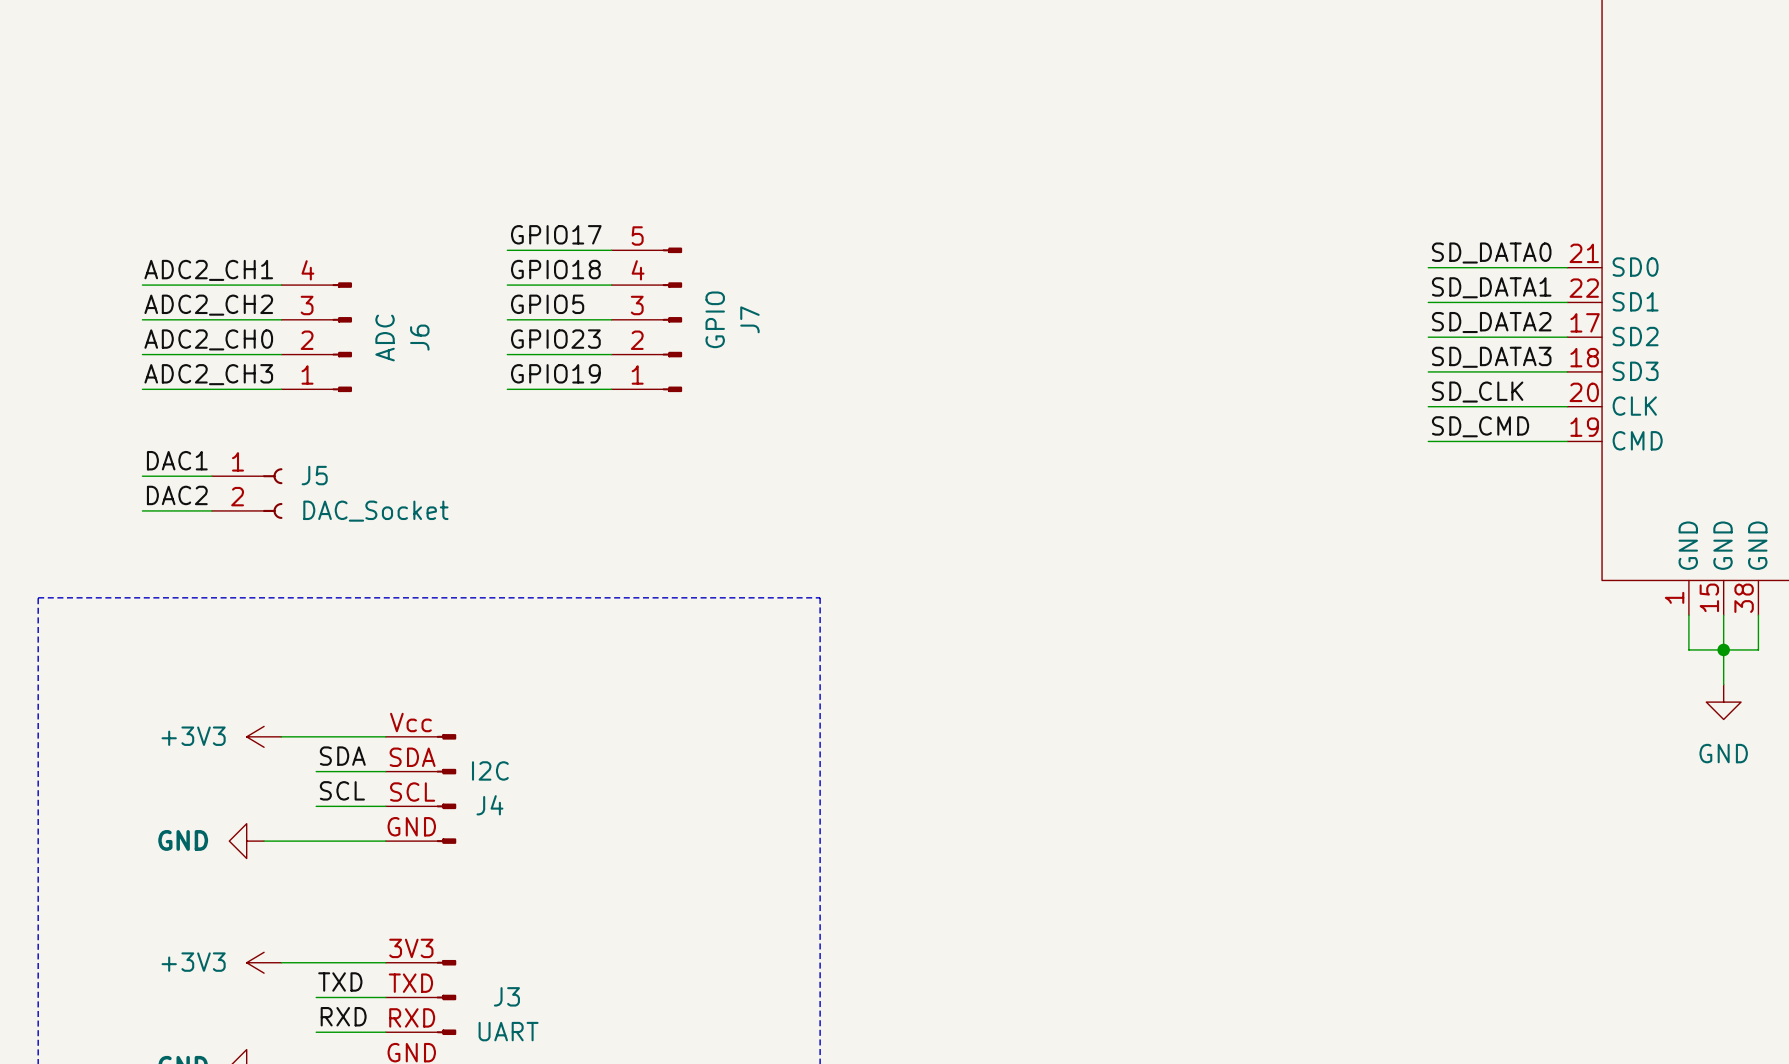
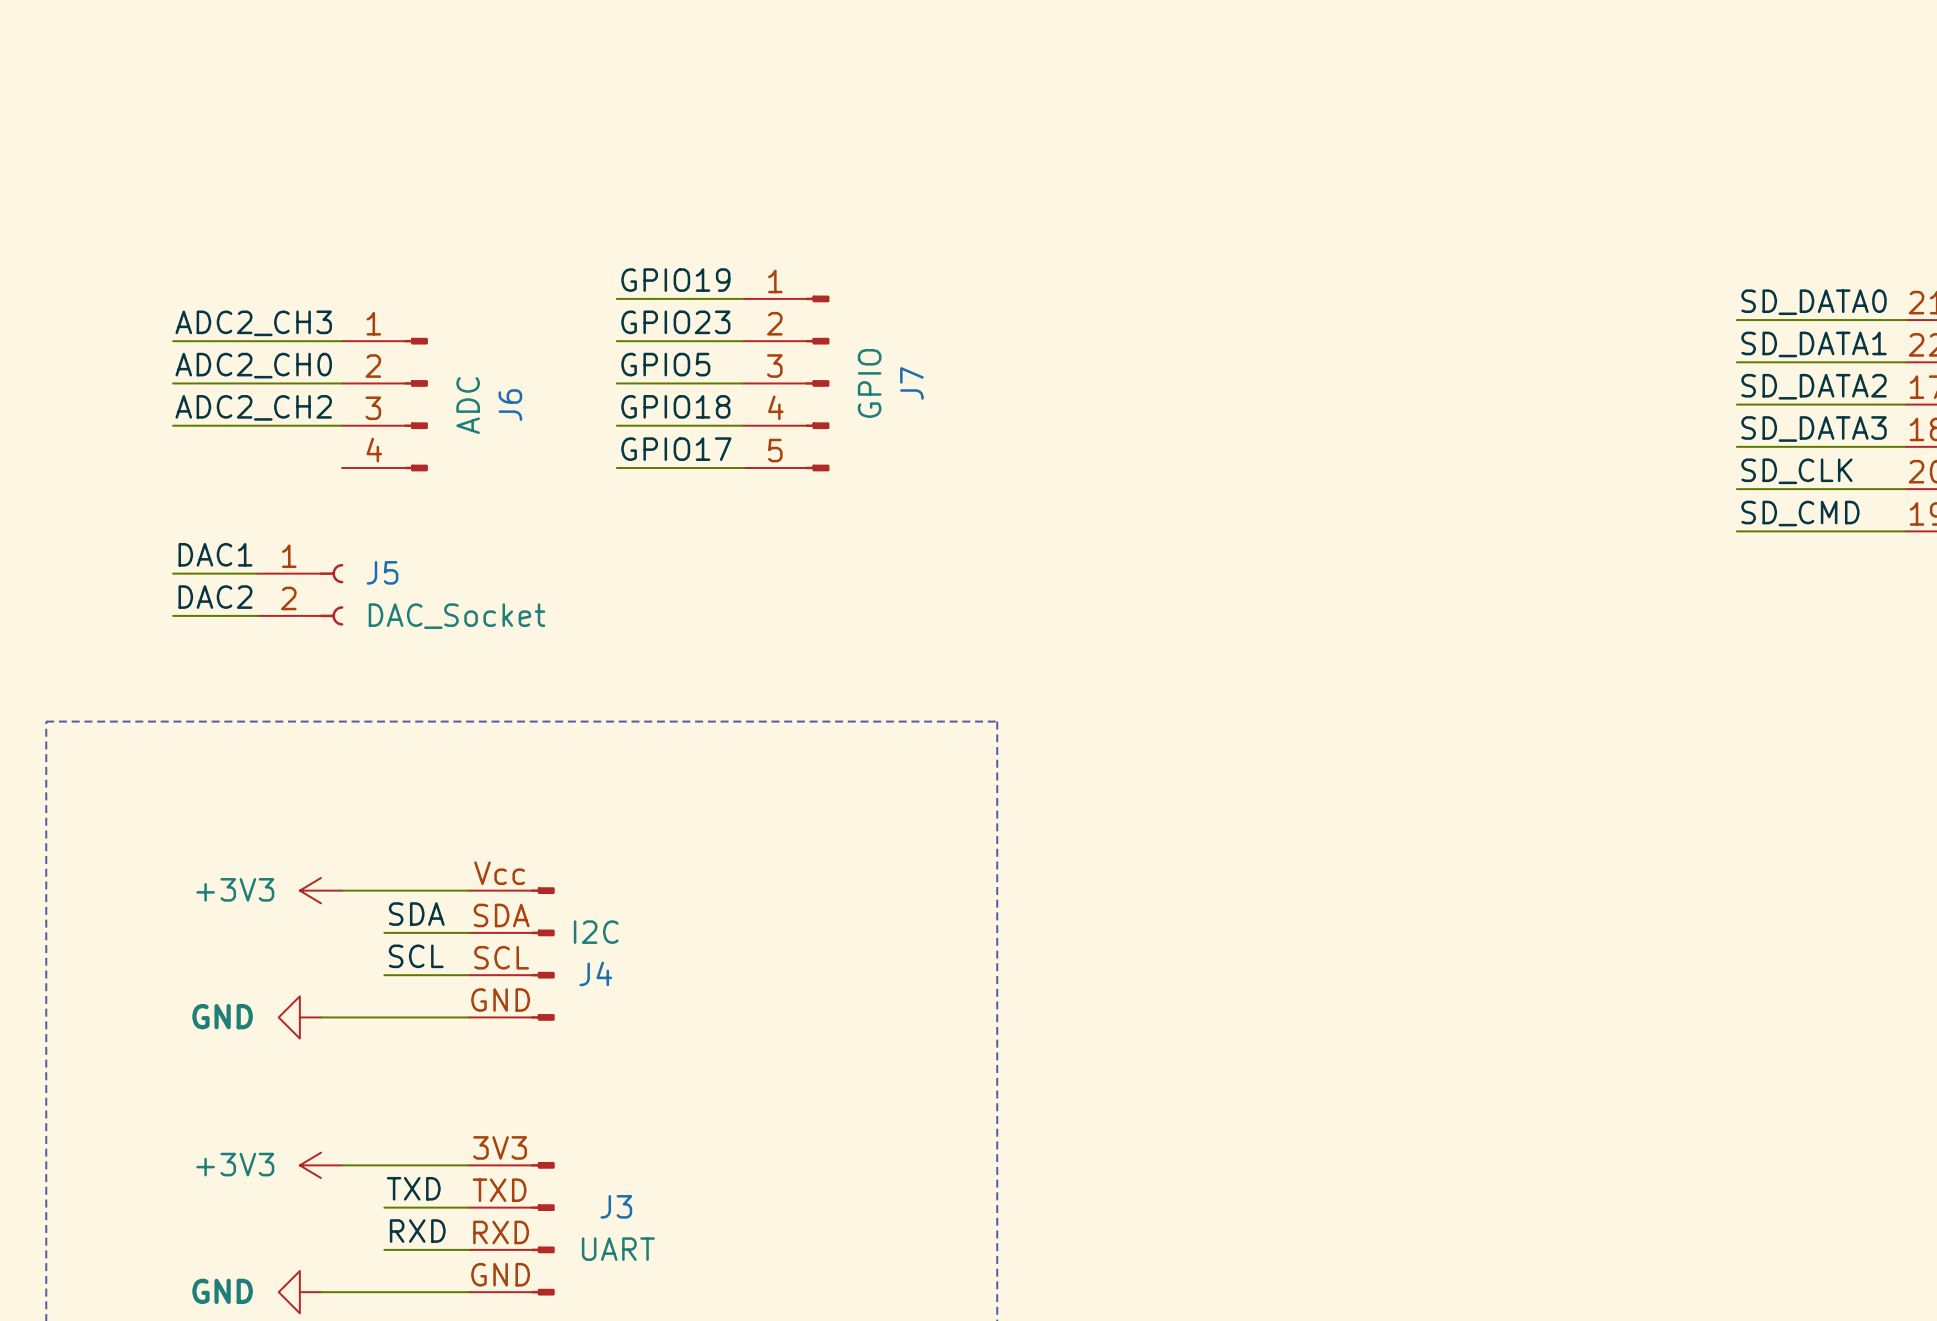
label: GPIO17 (556, 234) -> GPIO19 (675, 280)
label: GPIO18 (555, 269) -> GPIO23 (675, 322)
label: ADC2_CH1 (208, 270) -> ADC2_CH3 (253, 323)
label: ADC2_CH2 (208, 305) -> ADC2_CH0 (253, 365)
J7 flip: as is (672, 319) -> up-down (817, 383)
J6 flip: as is (342, 337) -> up-down (416, 404)
label: ADC2_CH0 (208, 339) -> ADC2_CH2 (253, 407)
label: GPIO23 (555, 339) -> GPIO18 (675, 406)
label: GPIO19 (555, 373) -> GPIO17 (676, 449)
label: ADC2_CH3 (208, 374) -> none
wire: (142, 389) (281, 389) -> none

